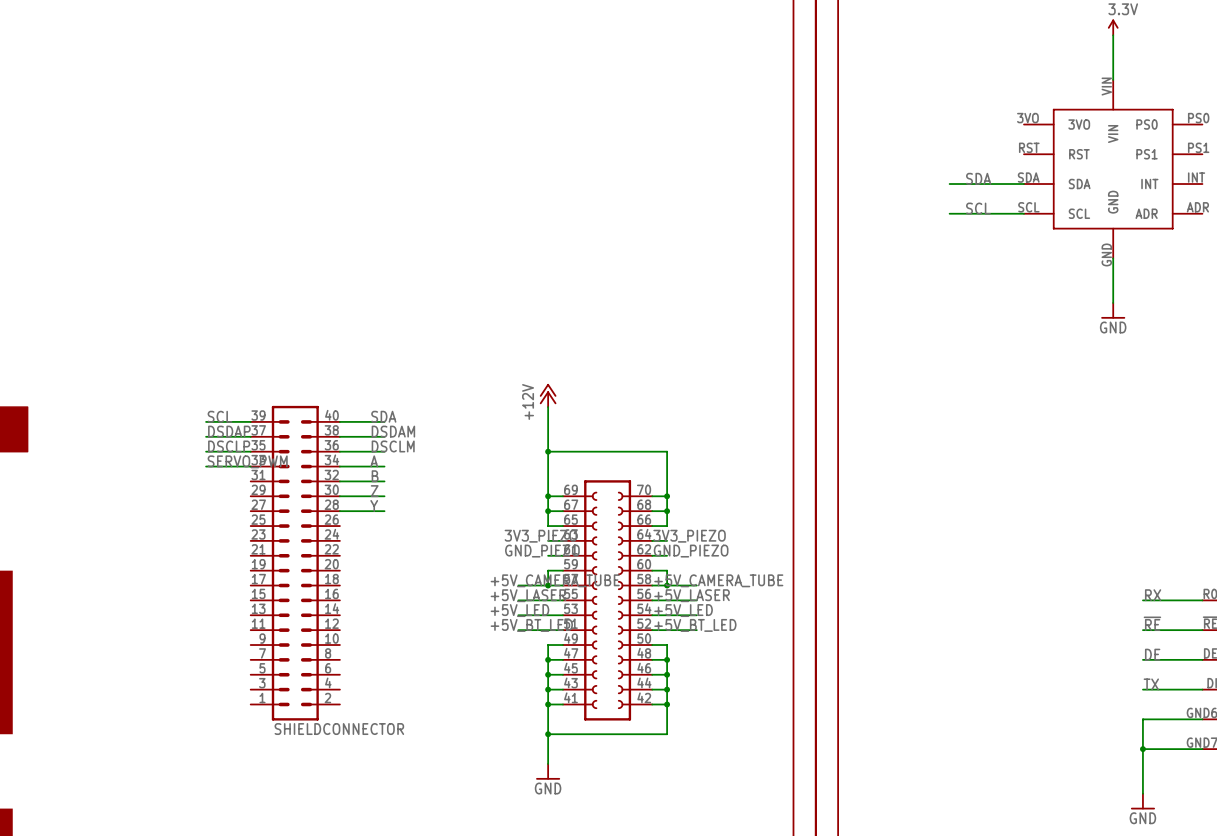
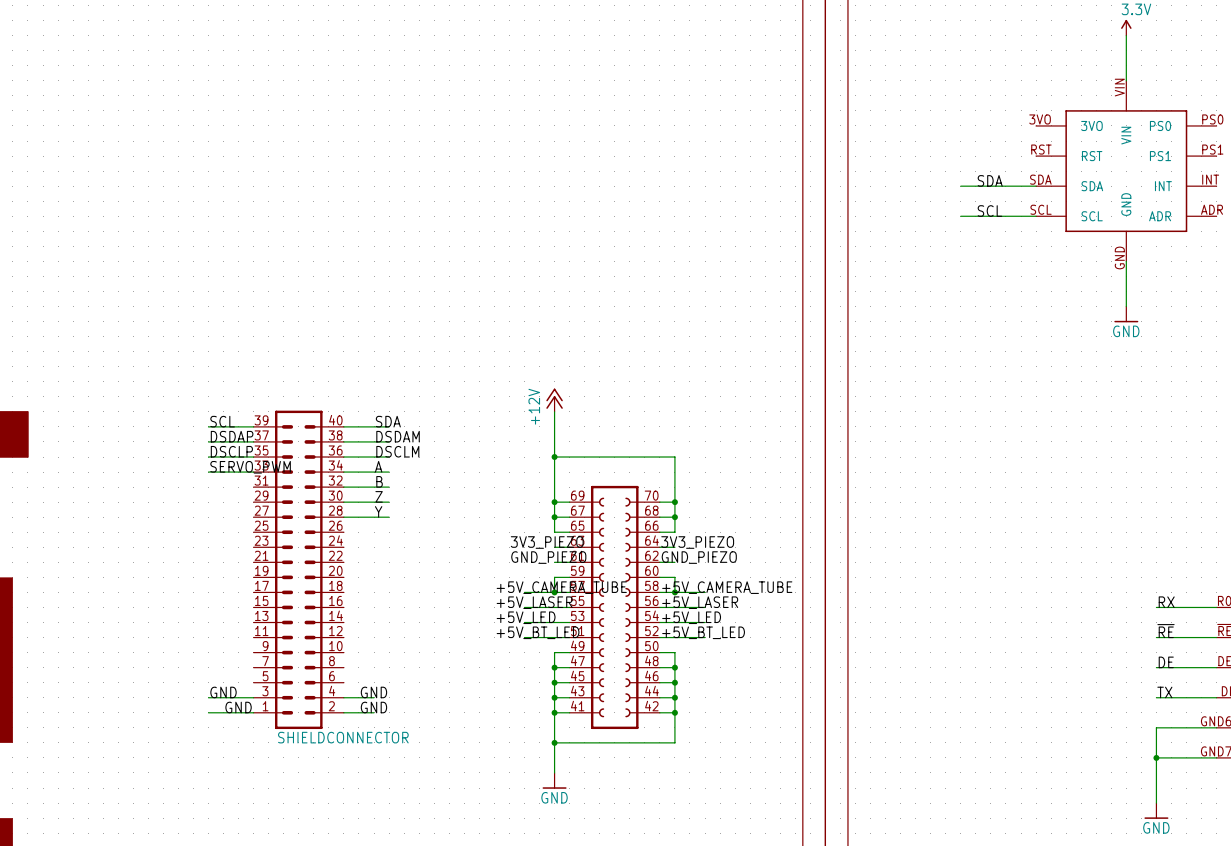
label: none -> GND (223, 692)
label: none -> GND (373, 692)
wire: none -> (208, 697) (253, 697)
wire: none -> (343, 697) (374, 697)
label: none -> GND (238, 707)
label: none -> GND (373, 707)
wire: none -> (208, 712) (253, 712)
wire: none -> (343, 712) (374, 712)

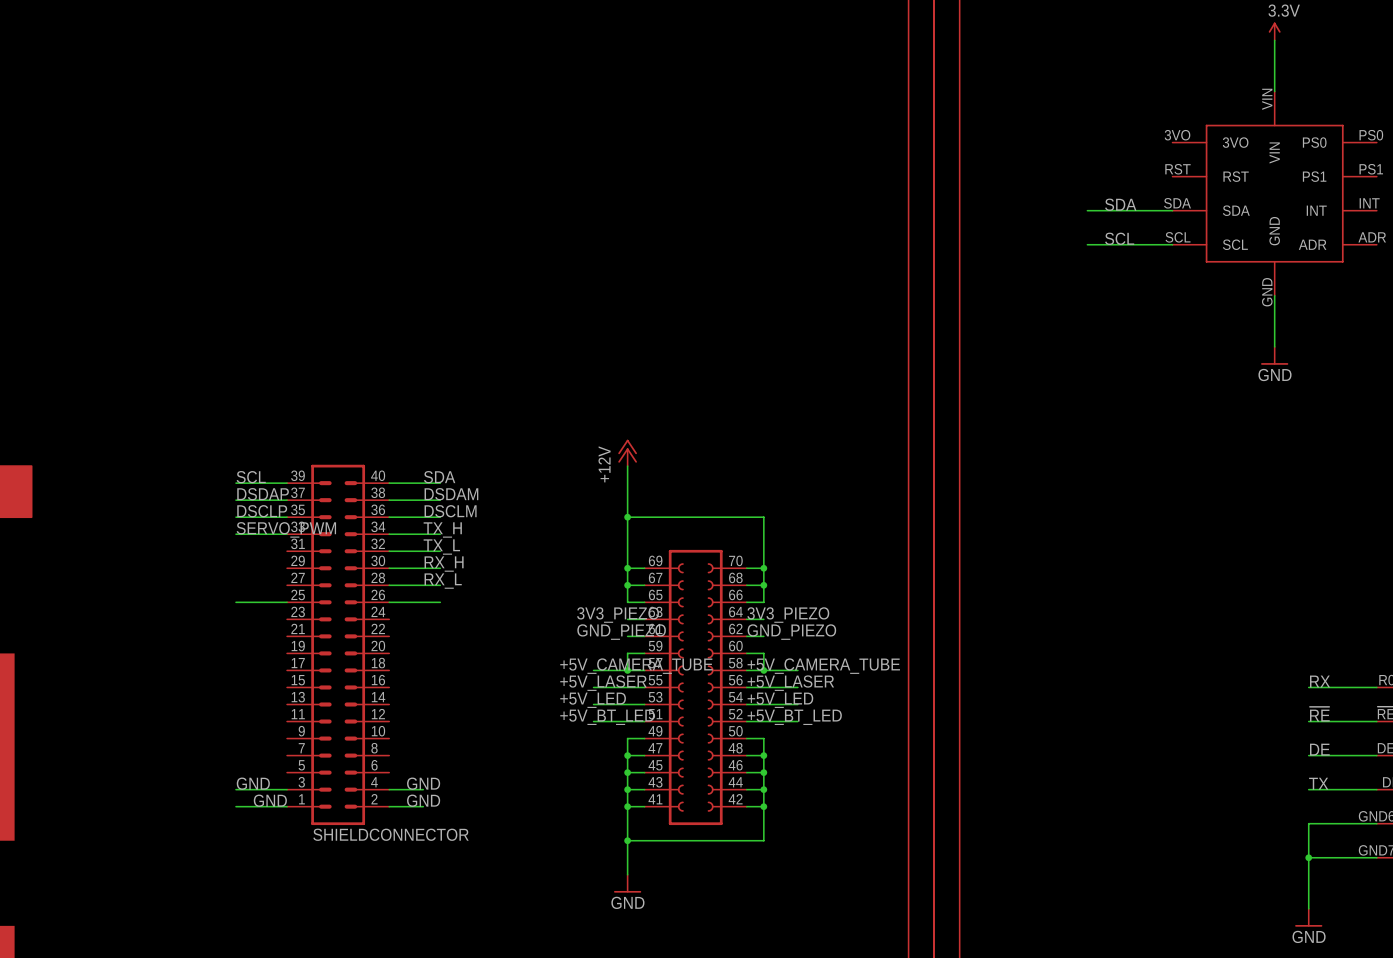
label: A (378, 466) -> TX_H (442, 529)
label: B (379, 481) -> TX_L (441, 547)
label: Z (379, 496) -> RX_H (444, 564)
label: Y (378, 511) -> RX_L (443, 581)
wire: none -> (235, 602) (287, 602)
wire: none -> (389, 602) (440, 602)

